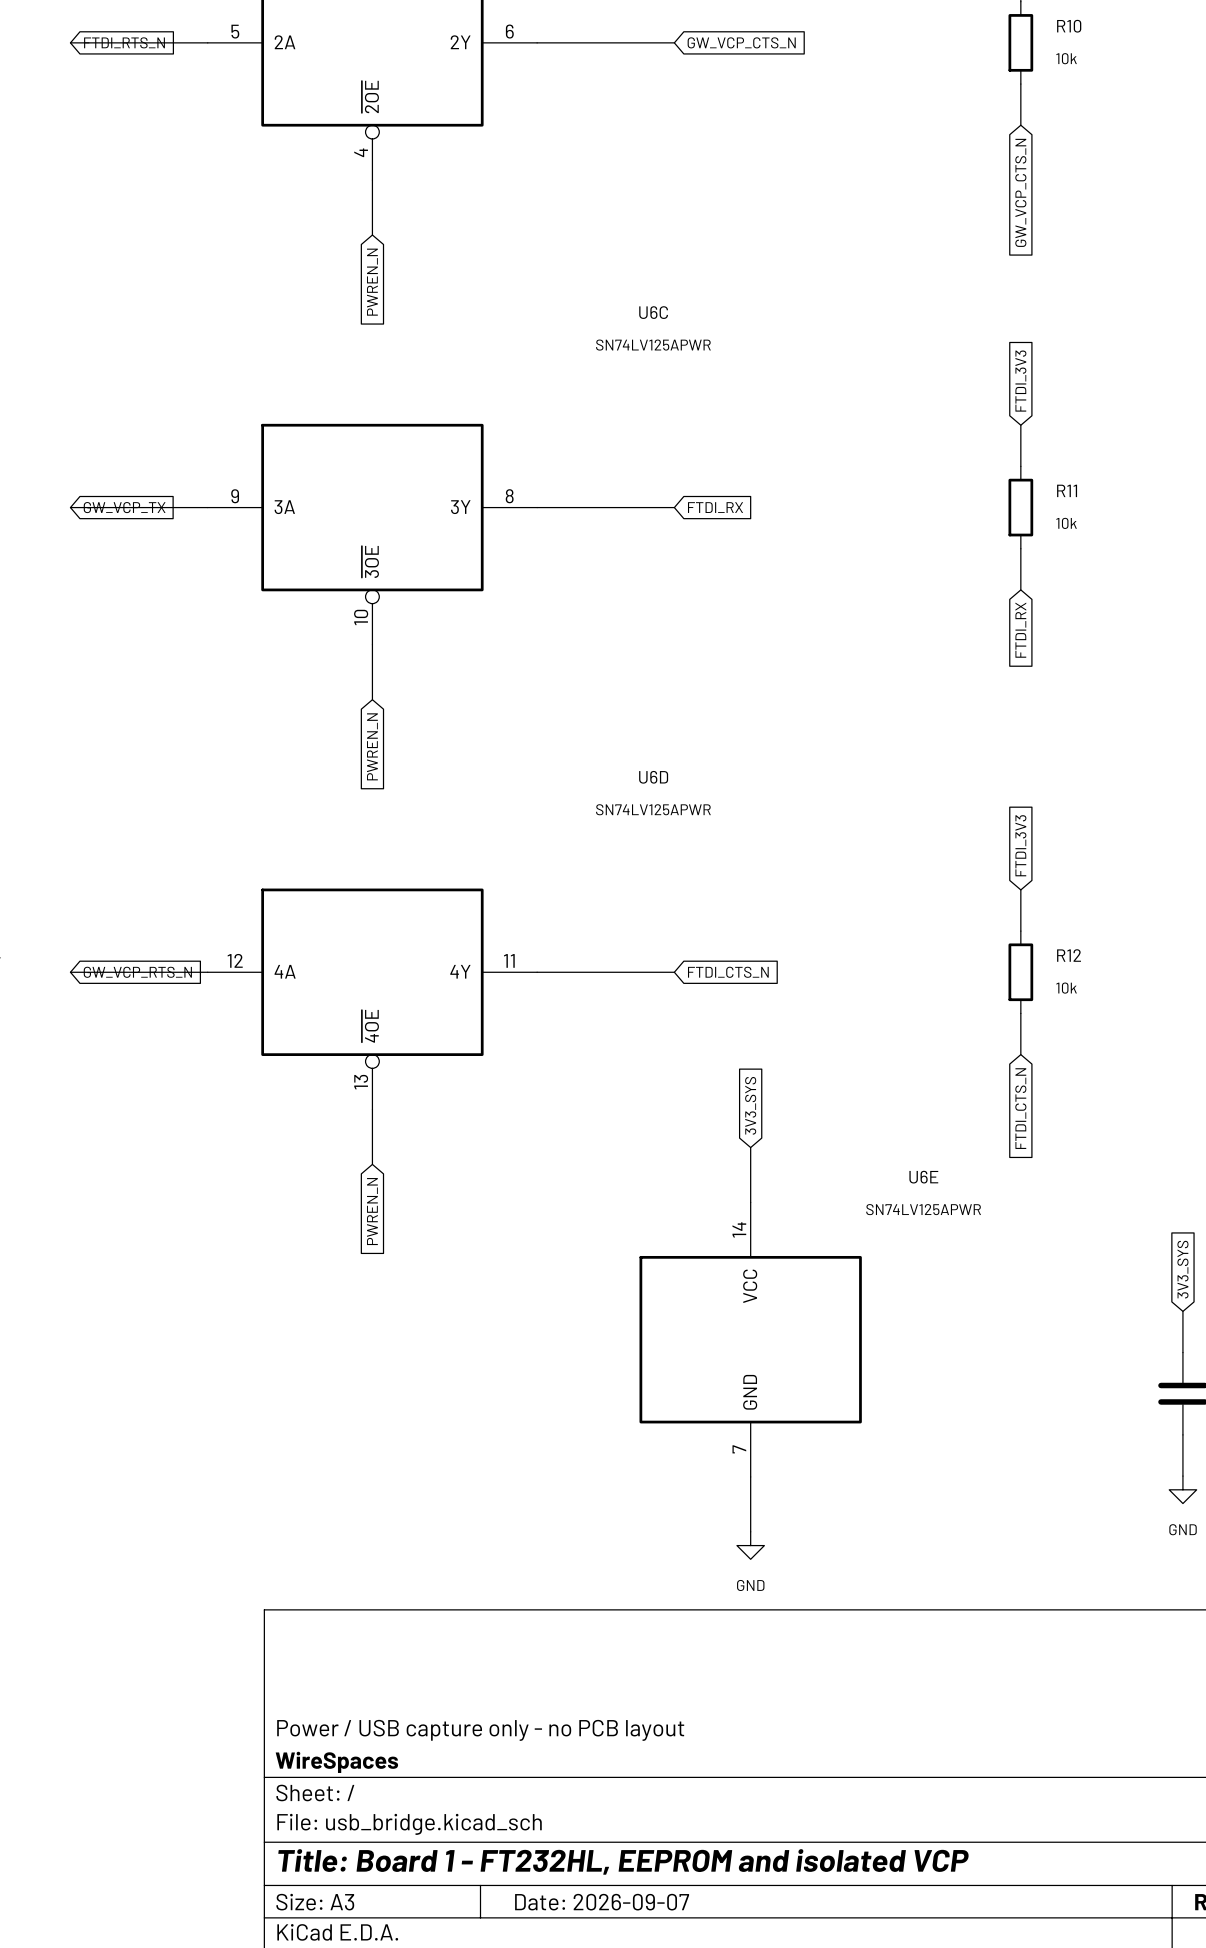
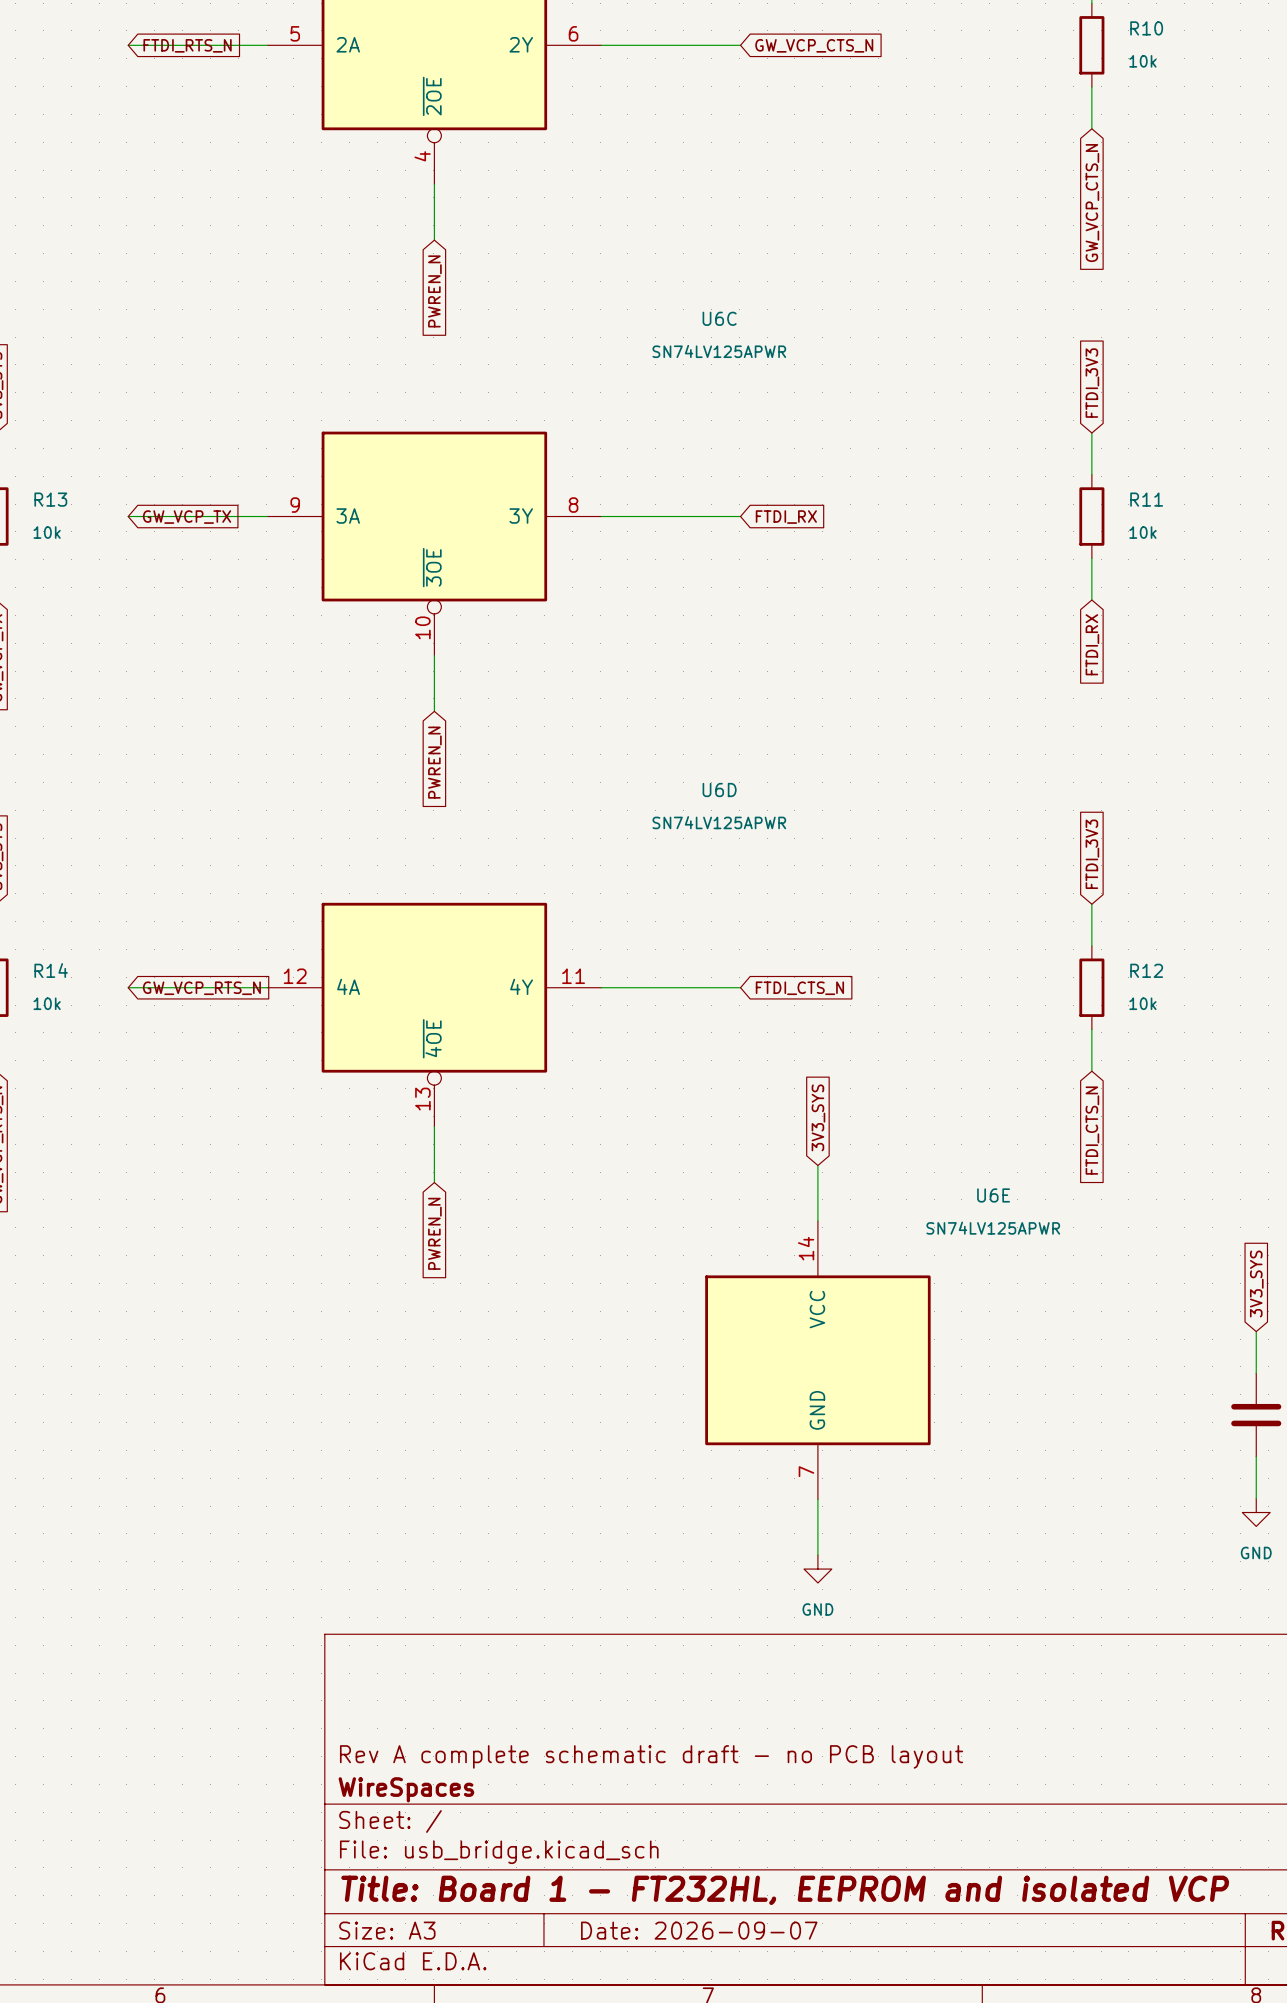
title block: Power / USB capture only - no PCB layout (480, 1730) -> Rev A complete schematic draft - no PCB layout (651, 1756)

